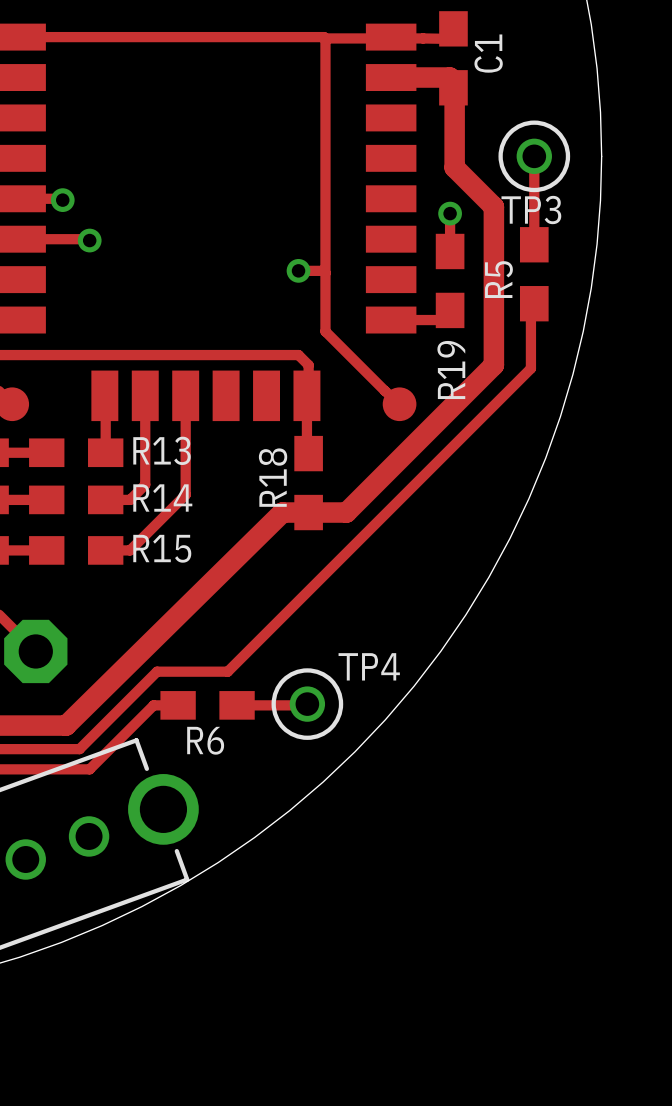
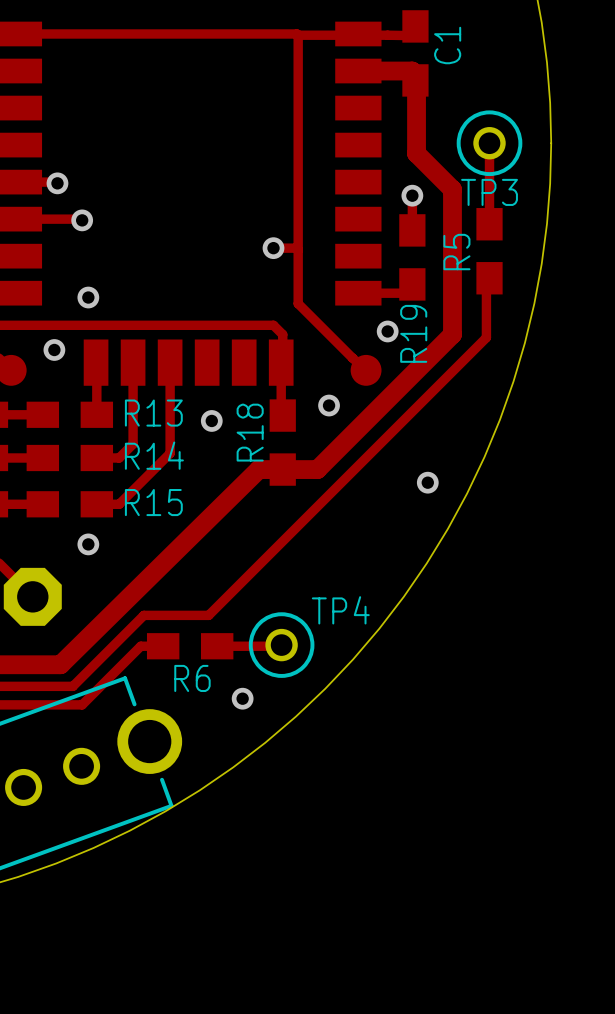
via: none -> (88, 297)
via: none -> (387, 331)
via: none -> (54, 349)
via: none -> (329, 405)
via: none -> (211, 420)
via: none -> (427, 482)
via: none -> (88, 544)
via: none -> (242, 698)

